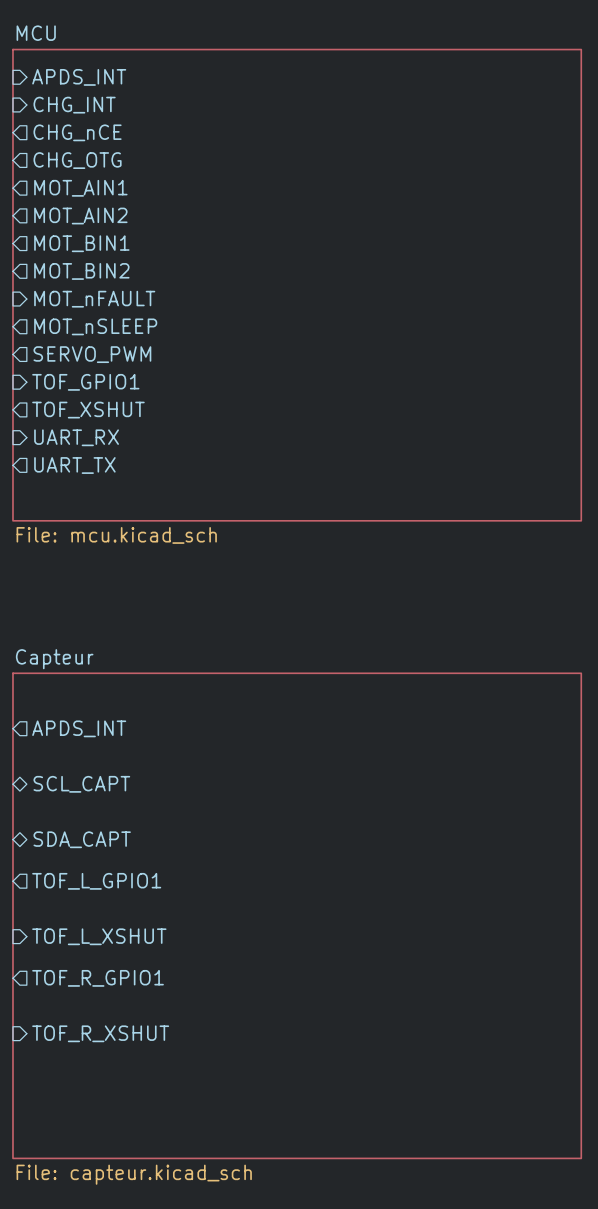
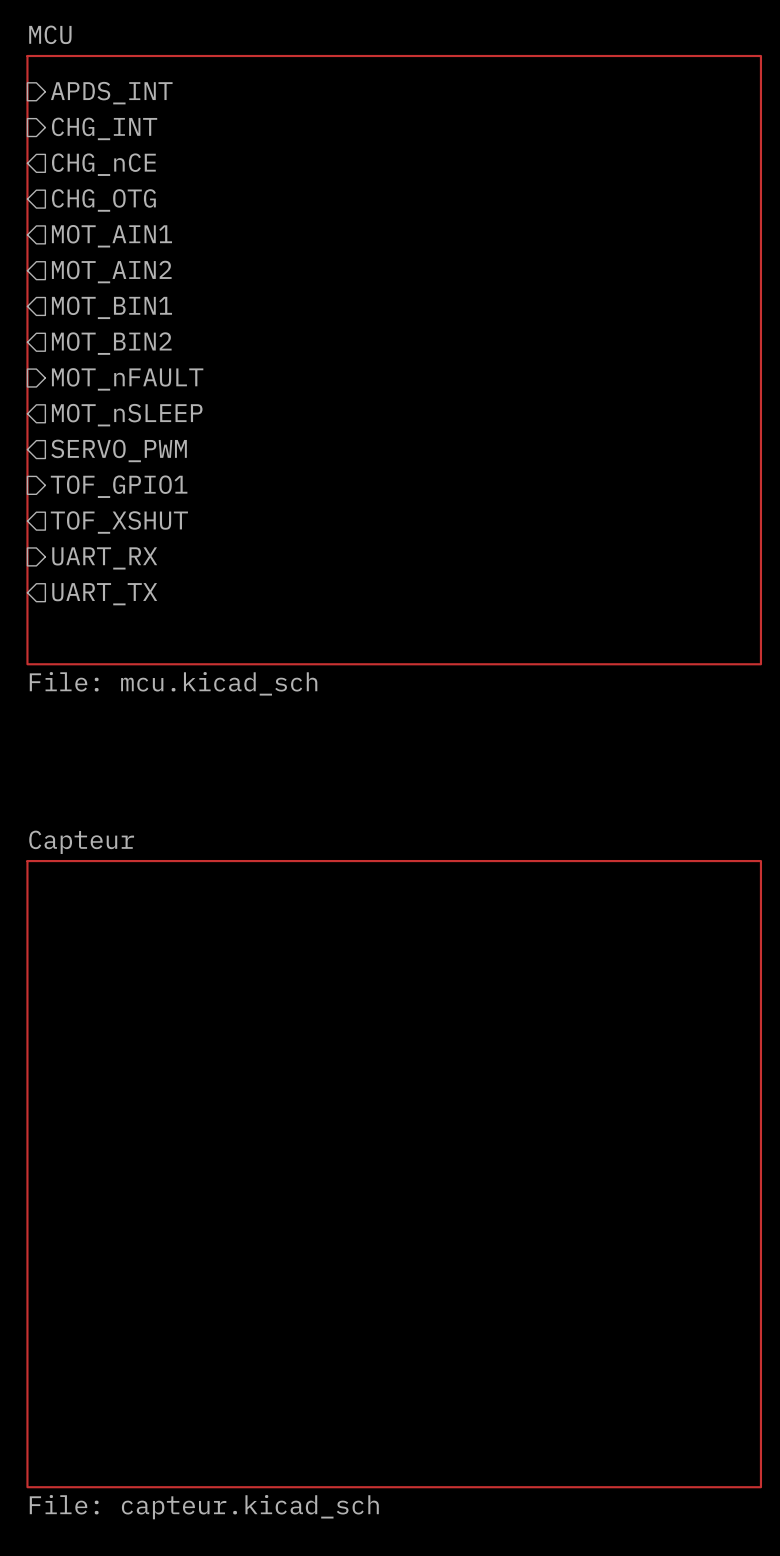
sheet pin: APDS_INT (79, 728) -> none
sheet pin: SCL_CAPT (81, 784) -> none
sheet pin: SDA_CAPT (82, 839) -> none
sheet pin: TOF_L_GPIO1 (96, 881) -> none
sheet pin: TOF_L_XSHUT (99, 936) -> none
sheet pin: TOF_R_GPIO1 (98, 978) -> none
sheet pin: TOF_R_XSHUT (100, 1033) -> none

